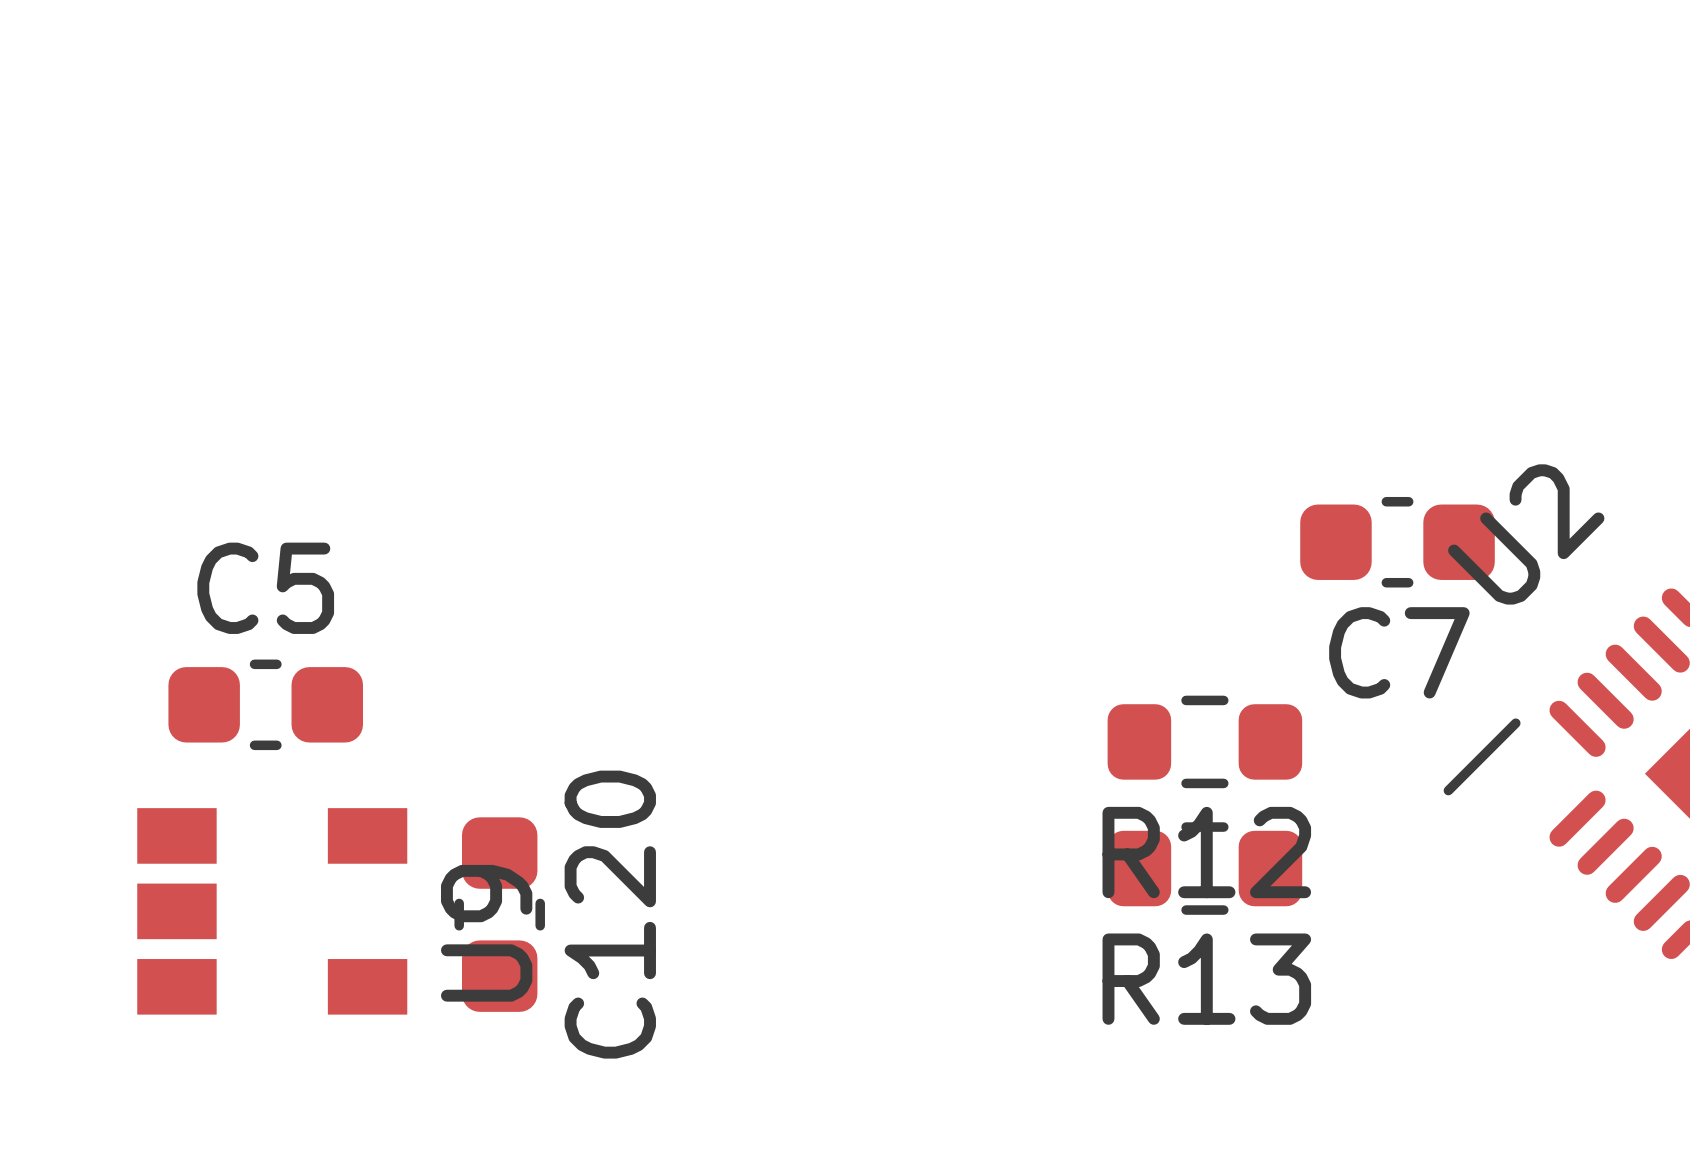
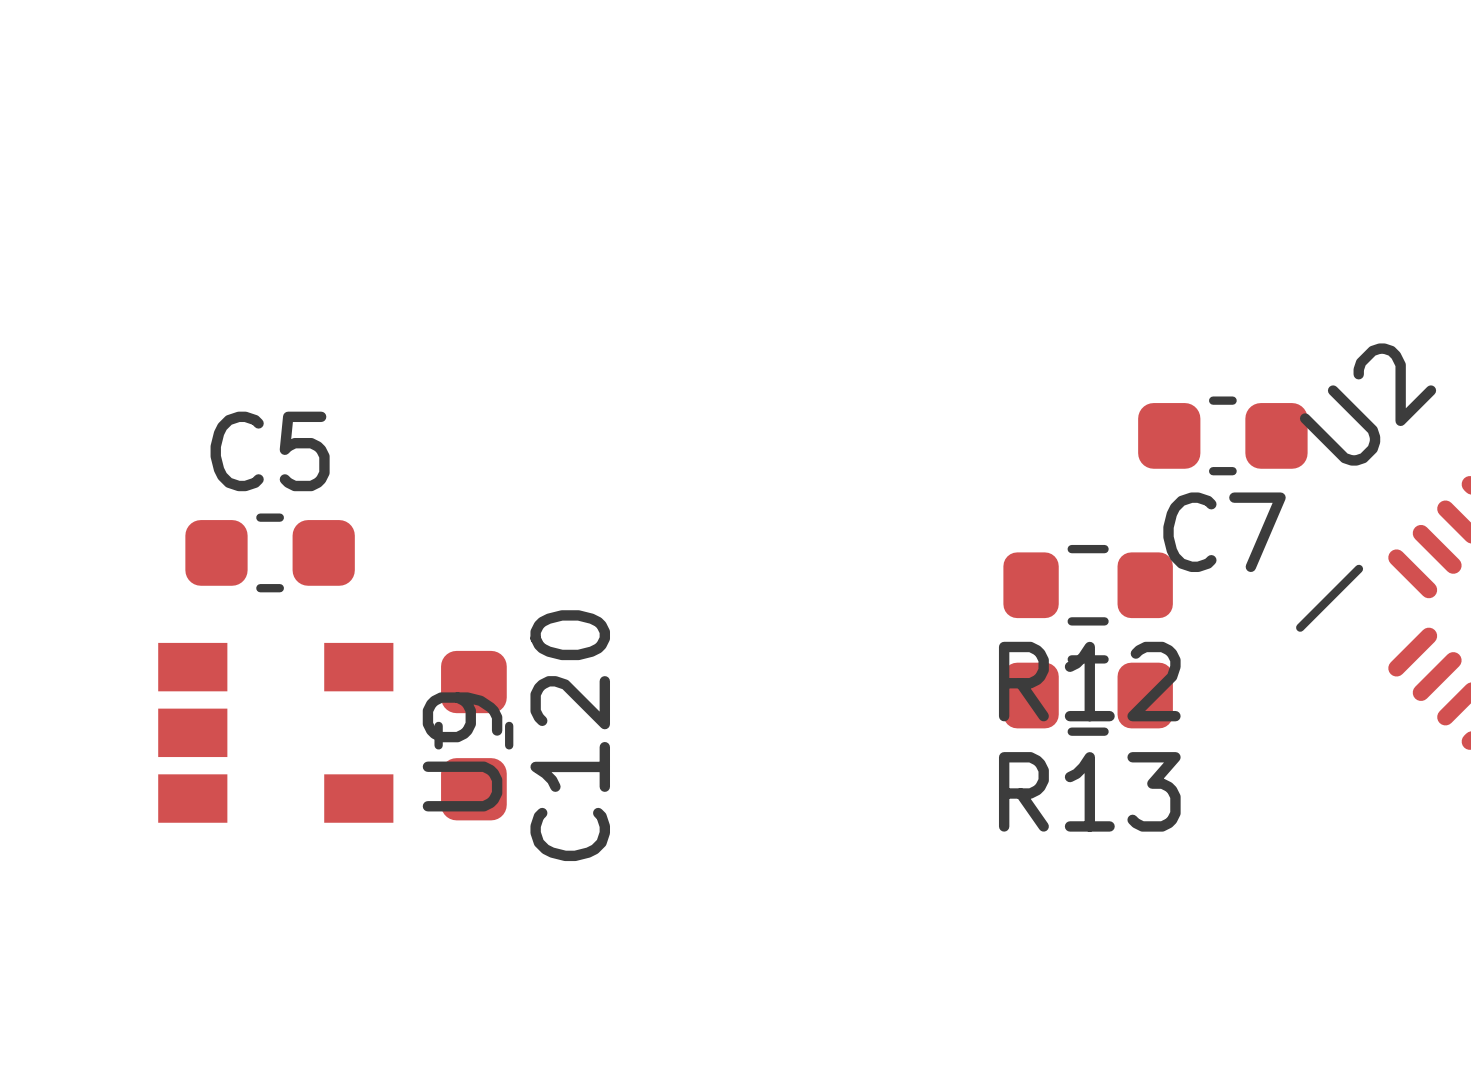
C7 position: (1397, 542) -> (1222, 435)

